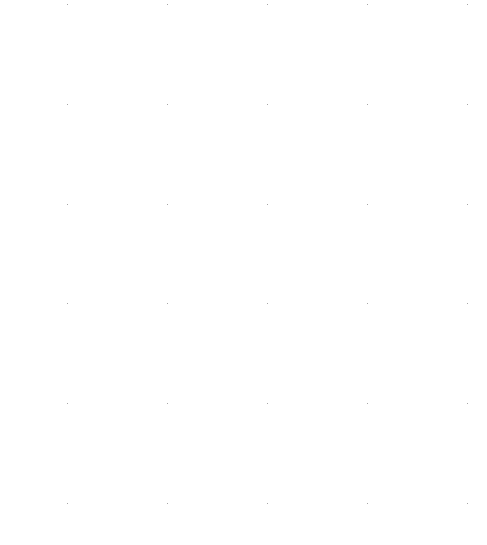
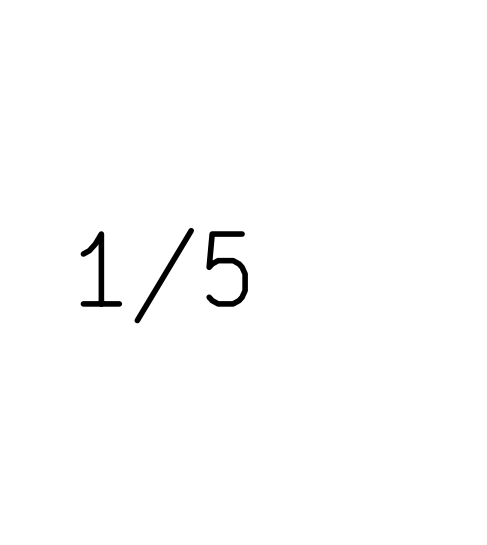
text: none -> 1/5 (164, 275)

